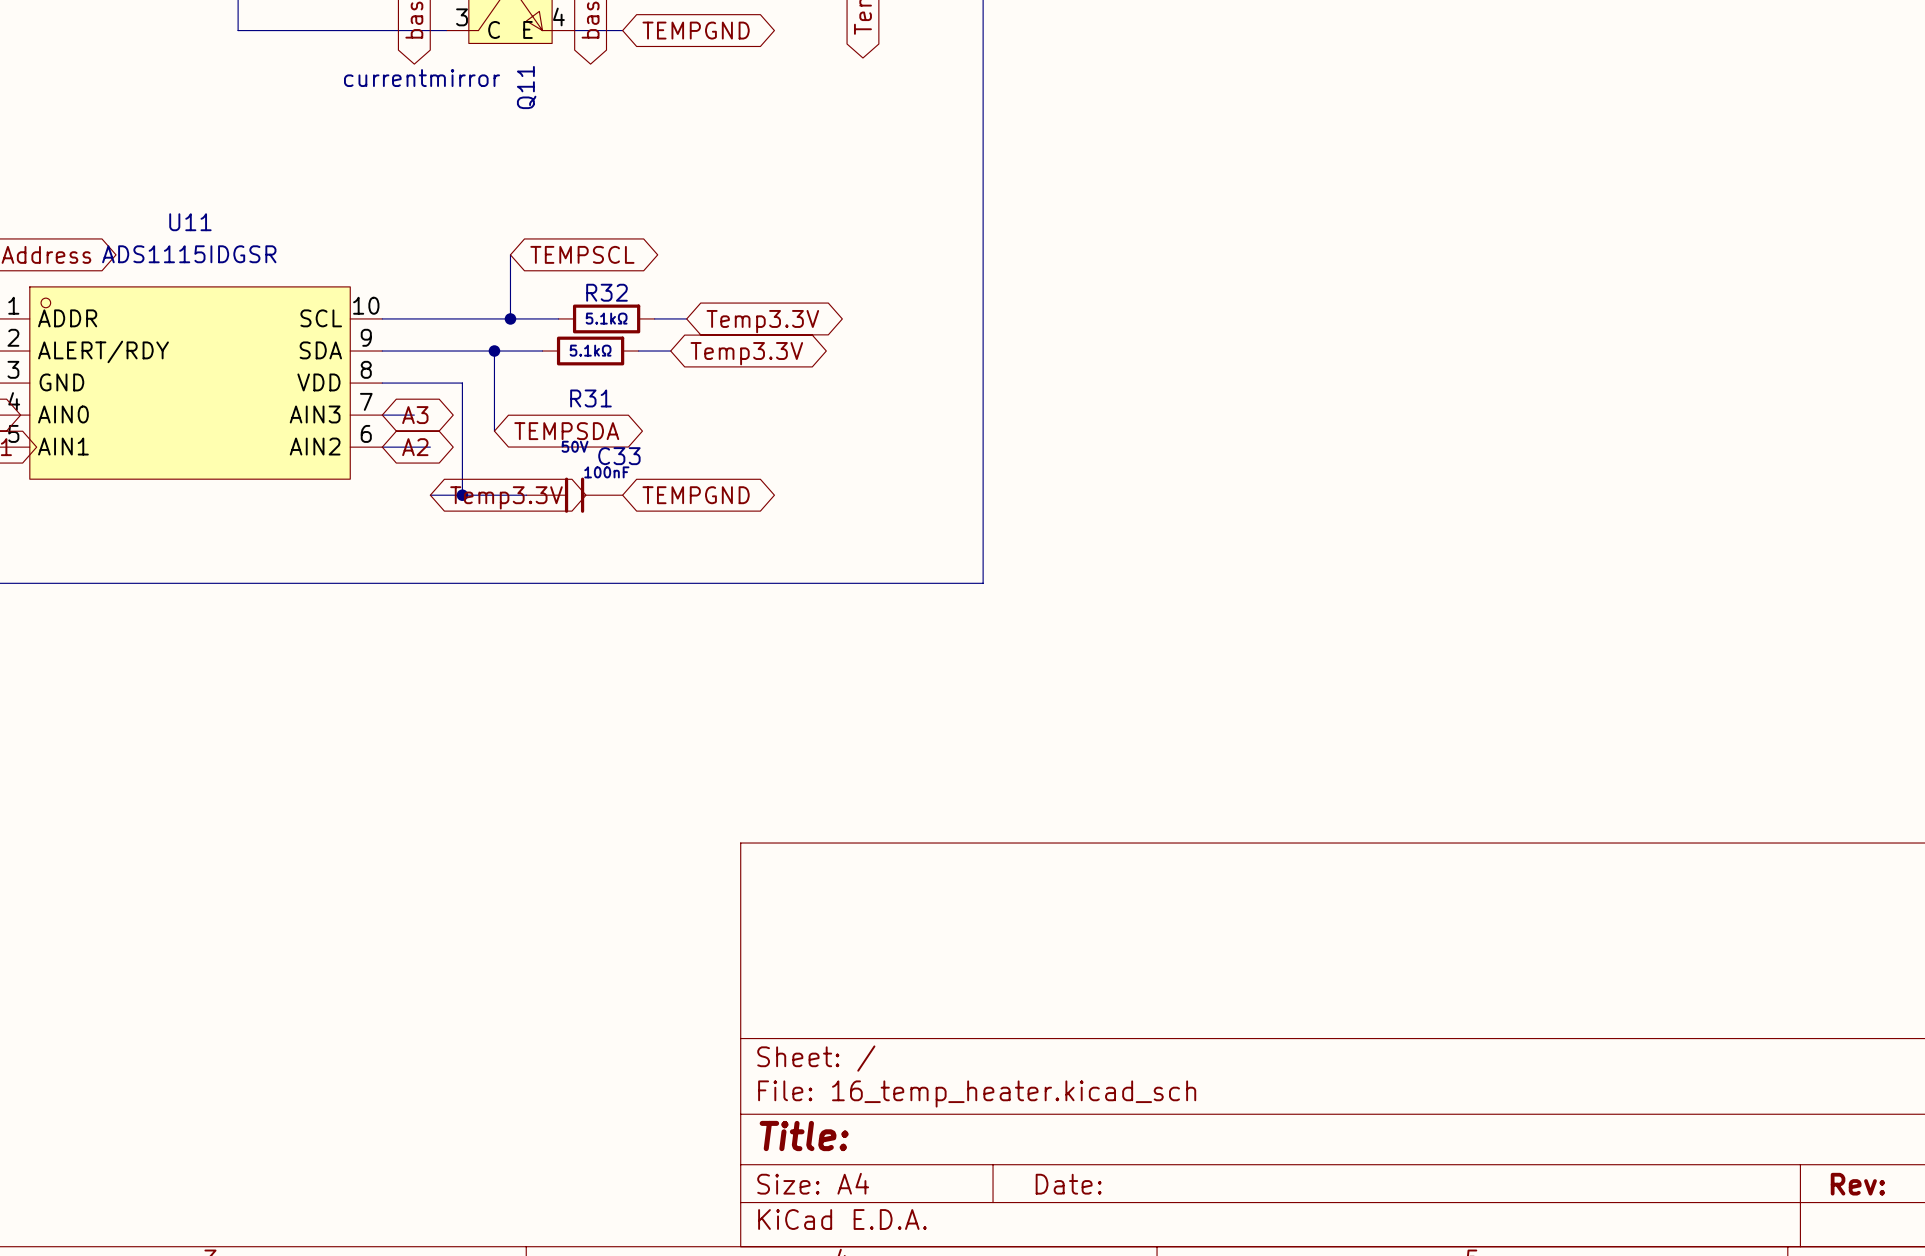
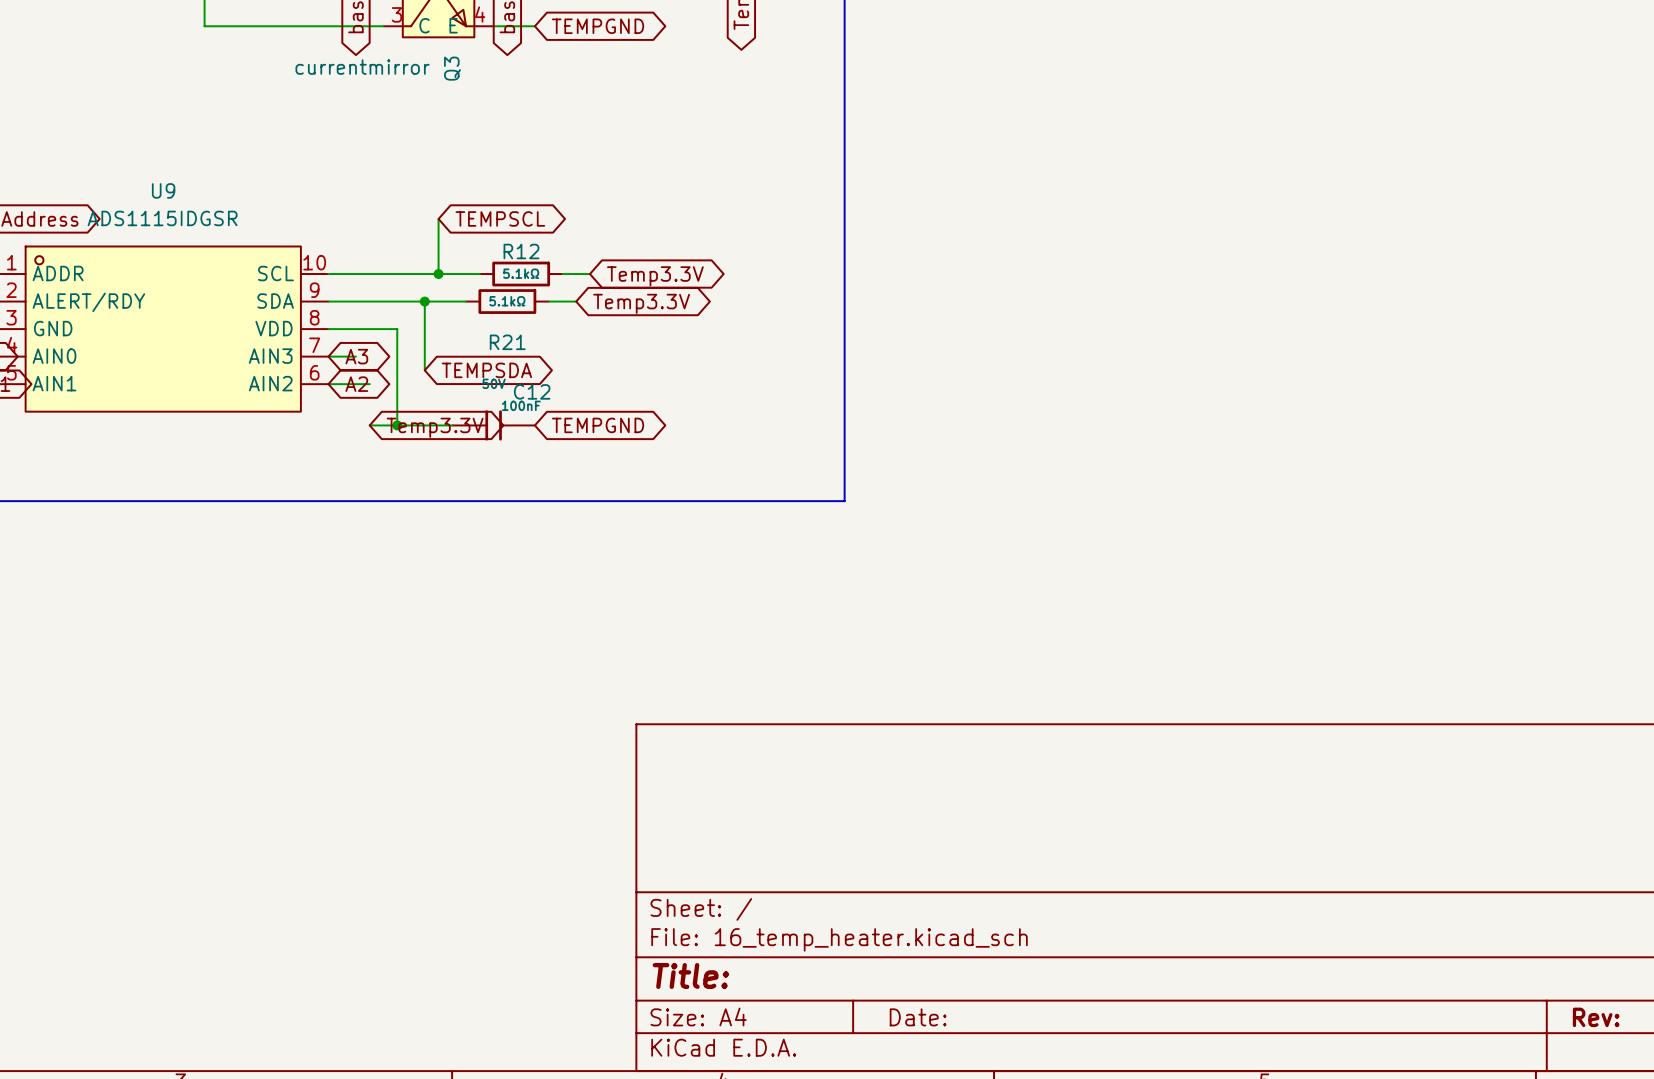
Q11 name: Q11 (526, 87) -> Q3 (452, 68)
U11 name: U11 (190, 222) -> U9 (163, 190)
R32 name: R32 (606, 292) -> R12 (521, 251)
R31 name: R31 (590, 398) -> R21 (507, 342)
C33 name: C33 (619, 456) -> C12 (532, 391)

